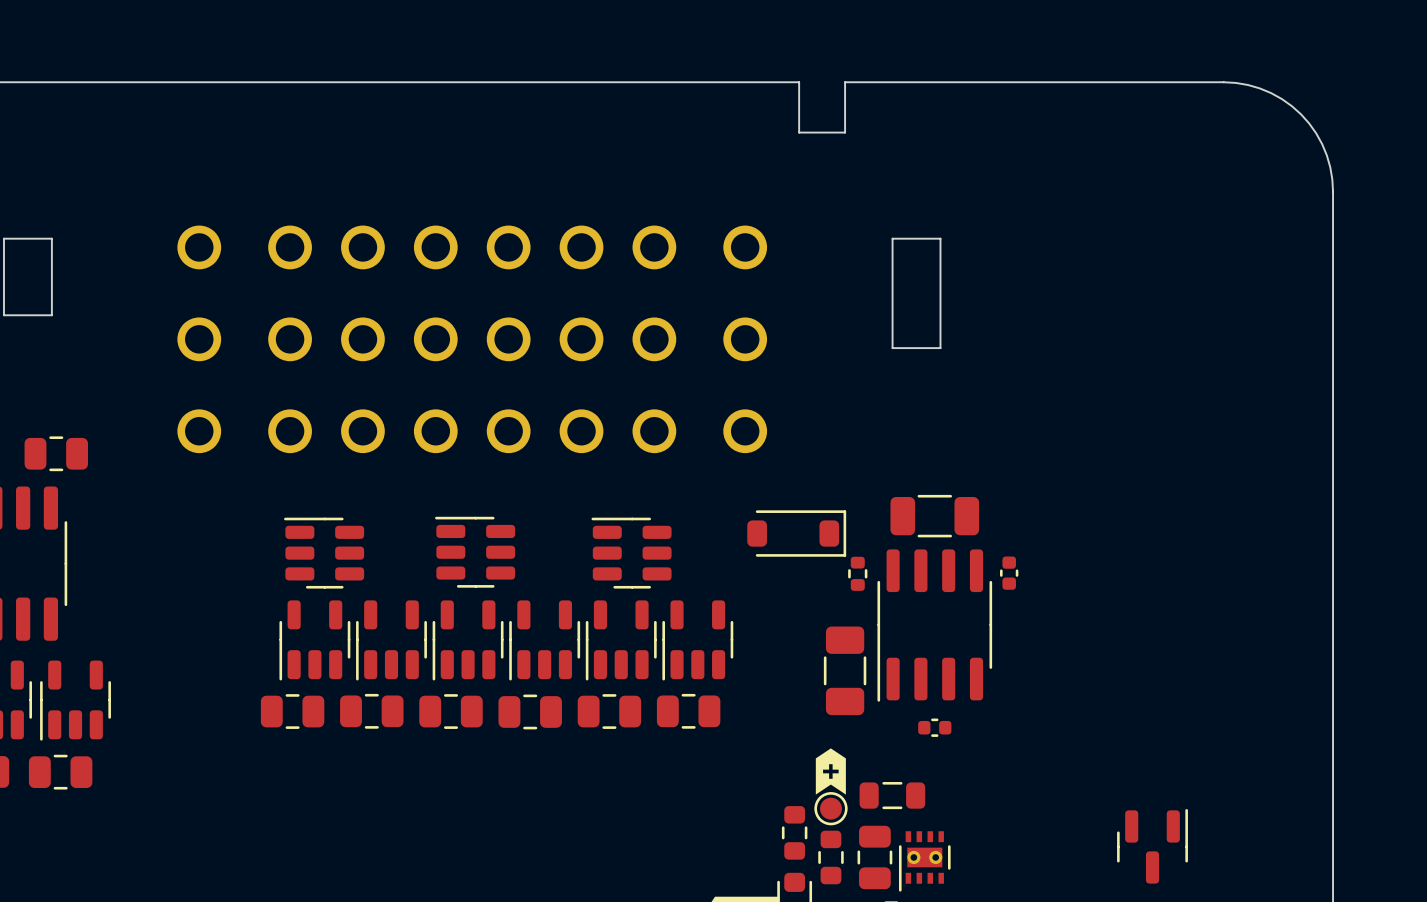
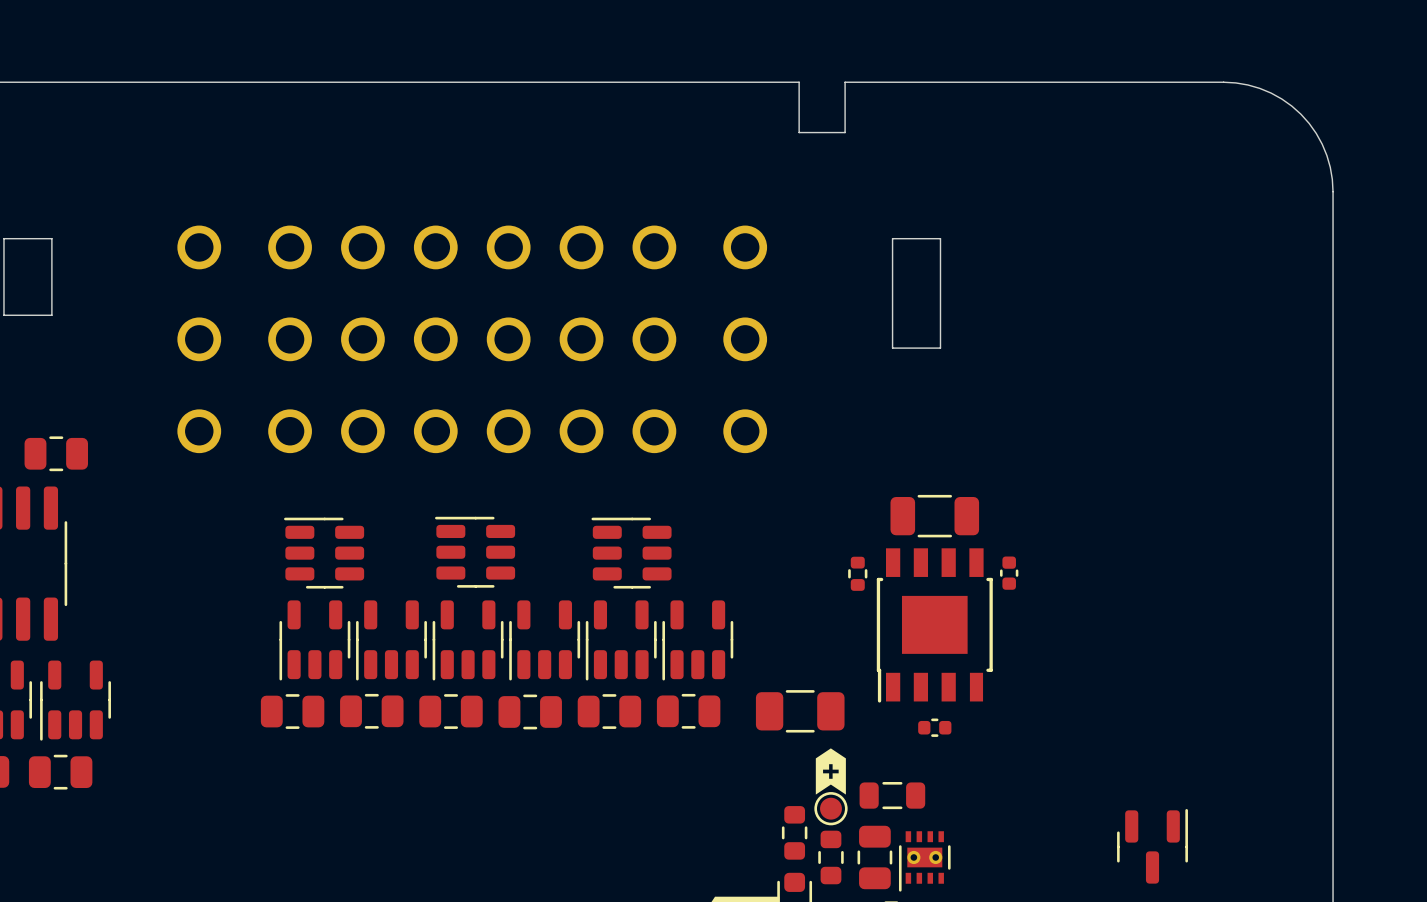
part: (796, 533) -> none
part footprint: [877, 549, 993, 702] -> [876, 548, 993, 703]
part rotation: 0° (845, 670) -> 90° clockwise (800, 711)
part position: (845, 670) -> (800, 711)

